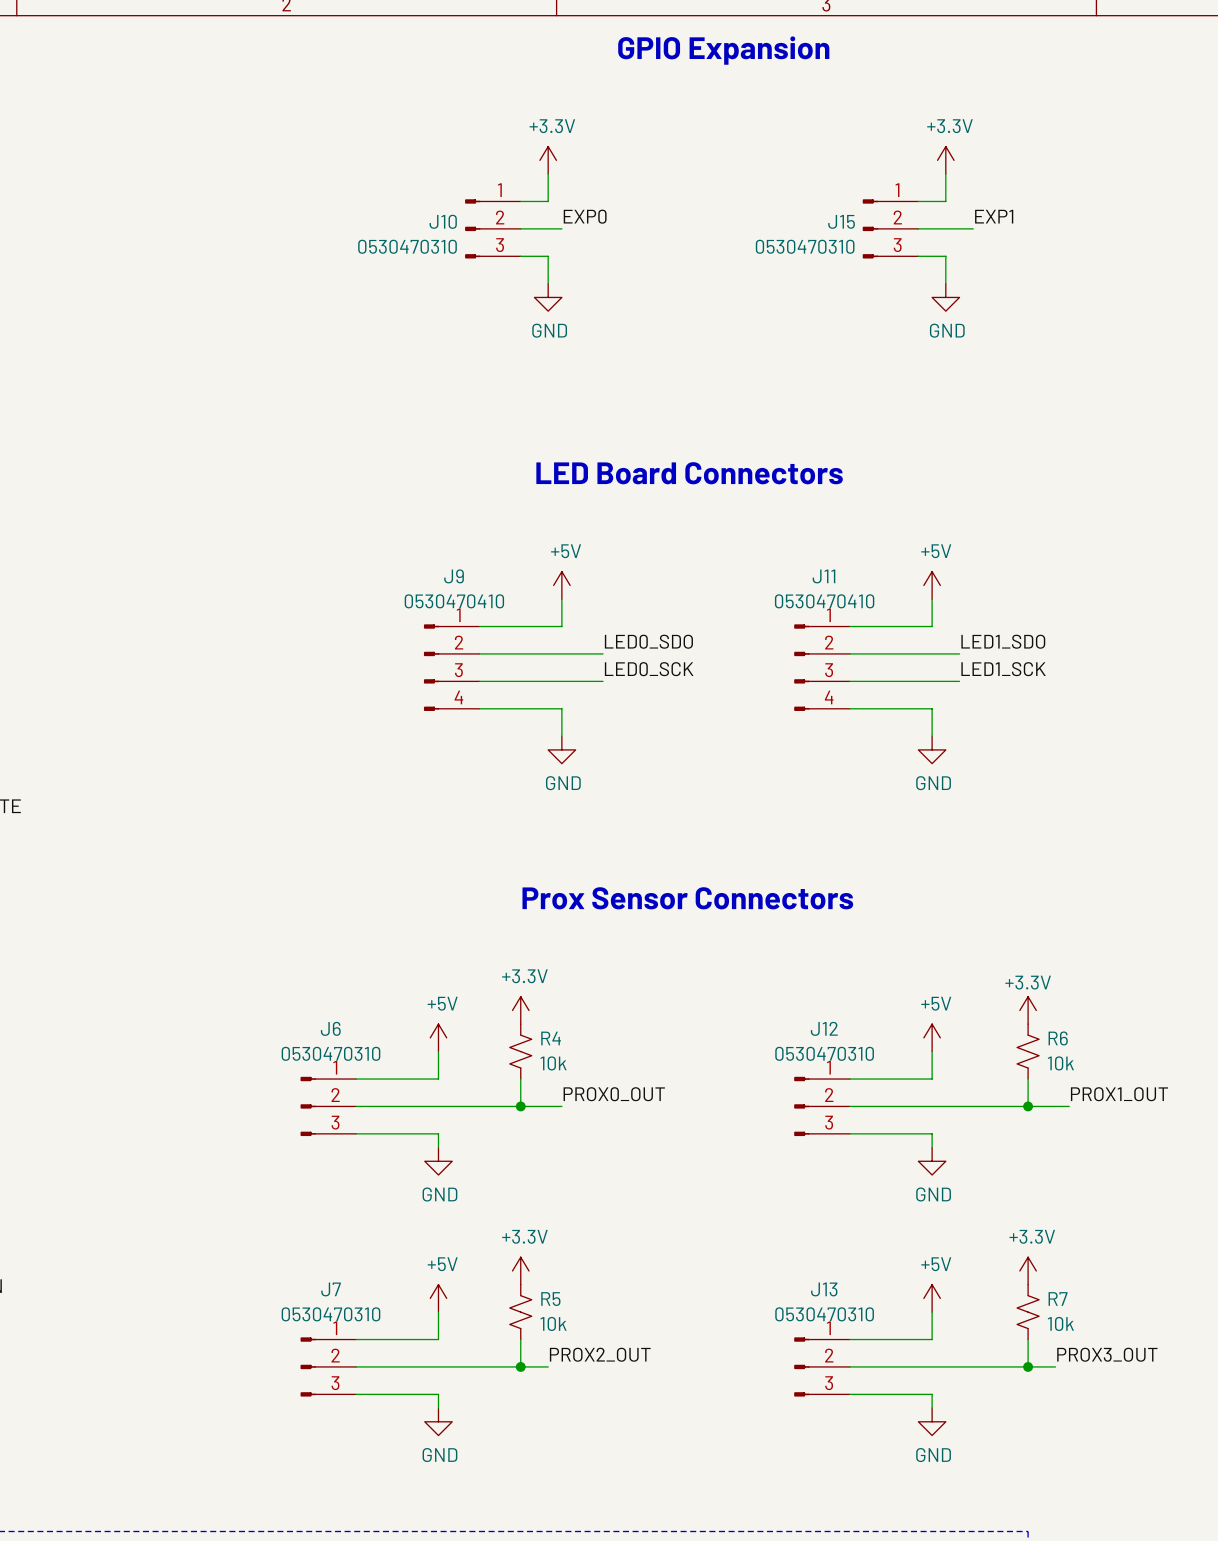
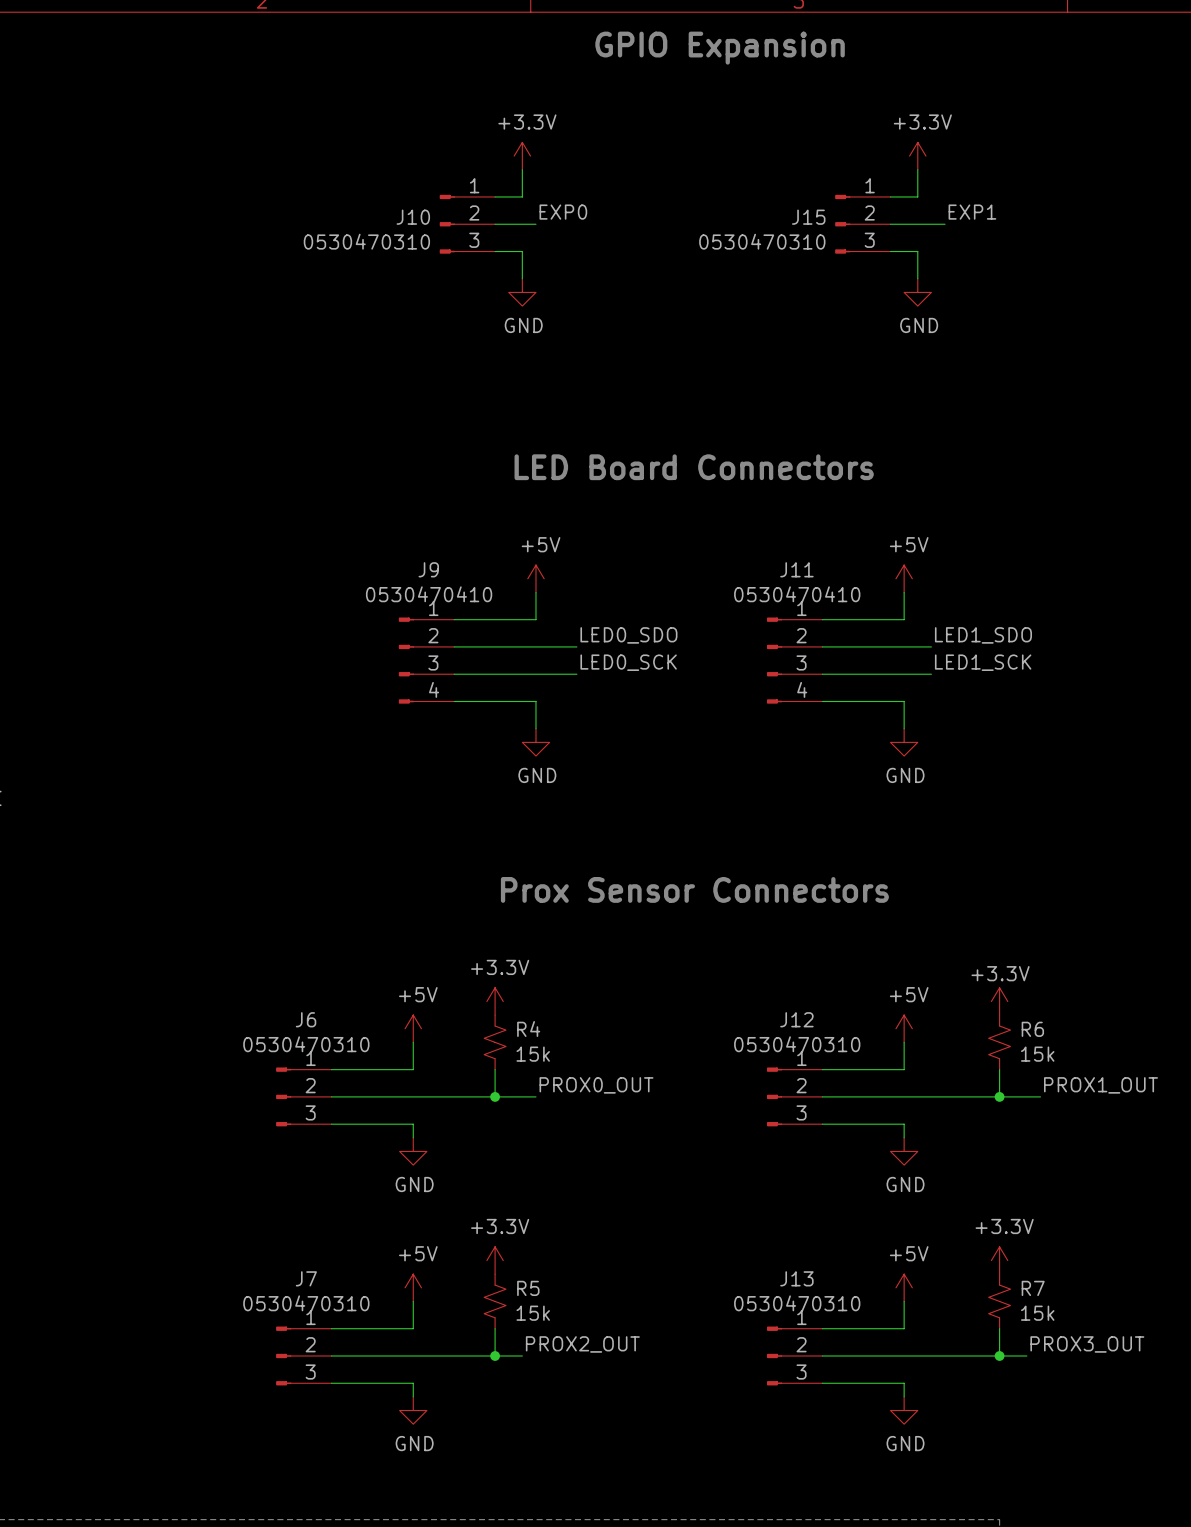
R4 value: 10k (553, 1063) -> 15k (533, 1054)
R6 value: 10k (1060, 1063) -> 15k (1037, 1054)
R5 value: 10k (553, 1323) -> 15k (533, 1313)
R7 value: 10k (1060, 1323) -> 15k (1037, 1313)

